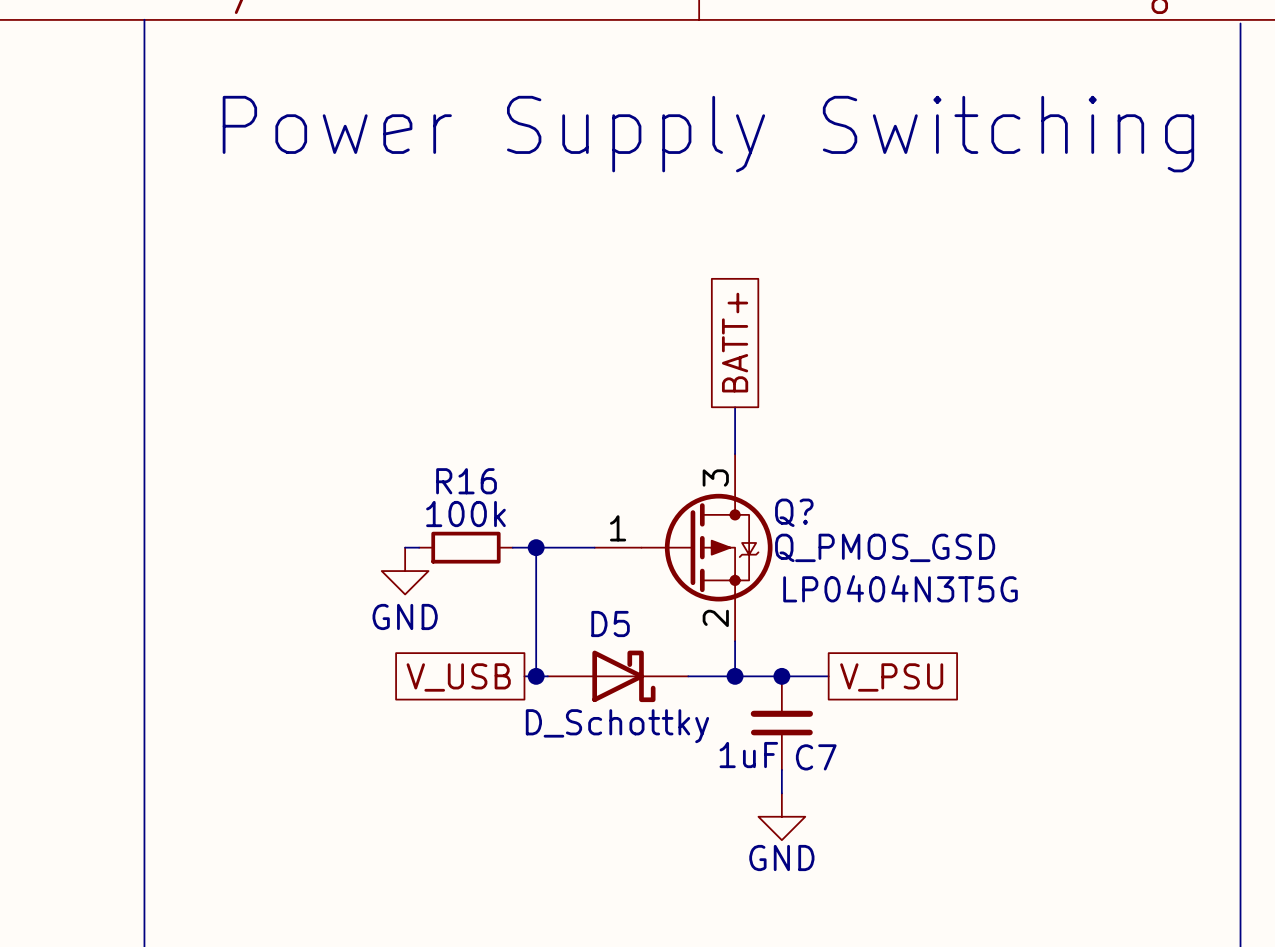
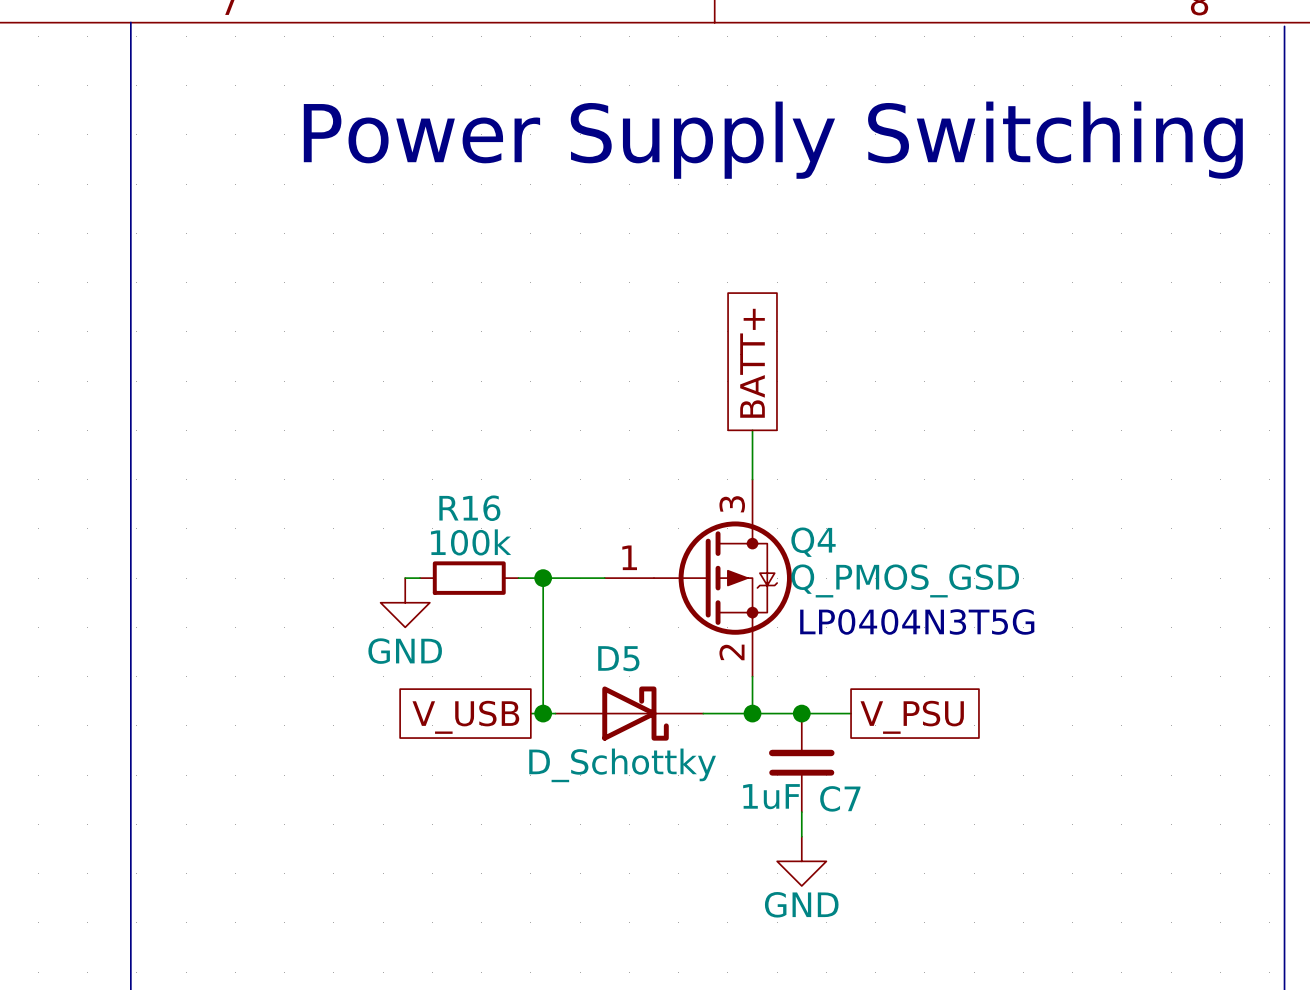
Q? name: Q? (794, 512) -> Q4 (813, 542)

